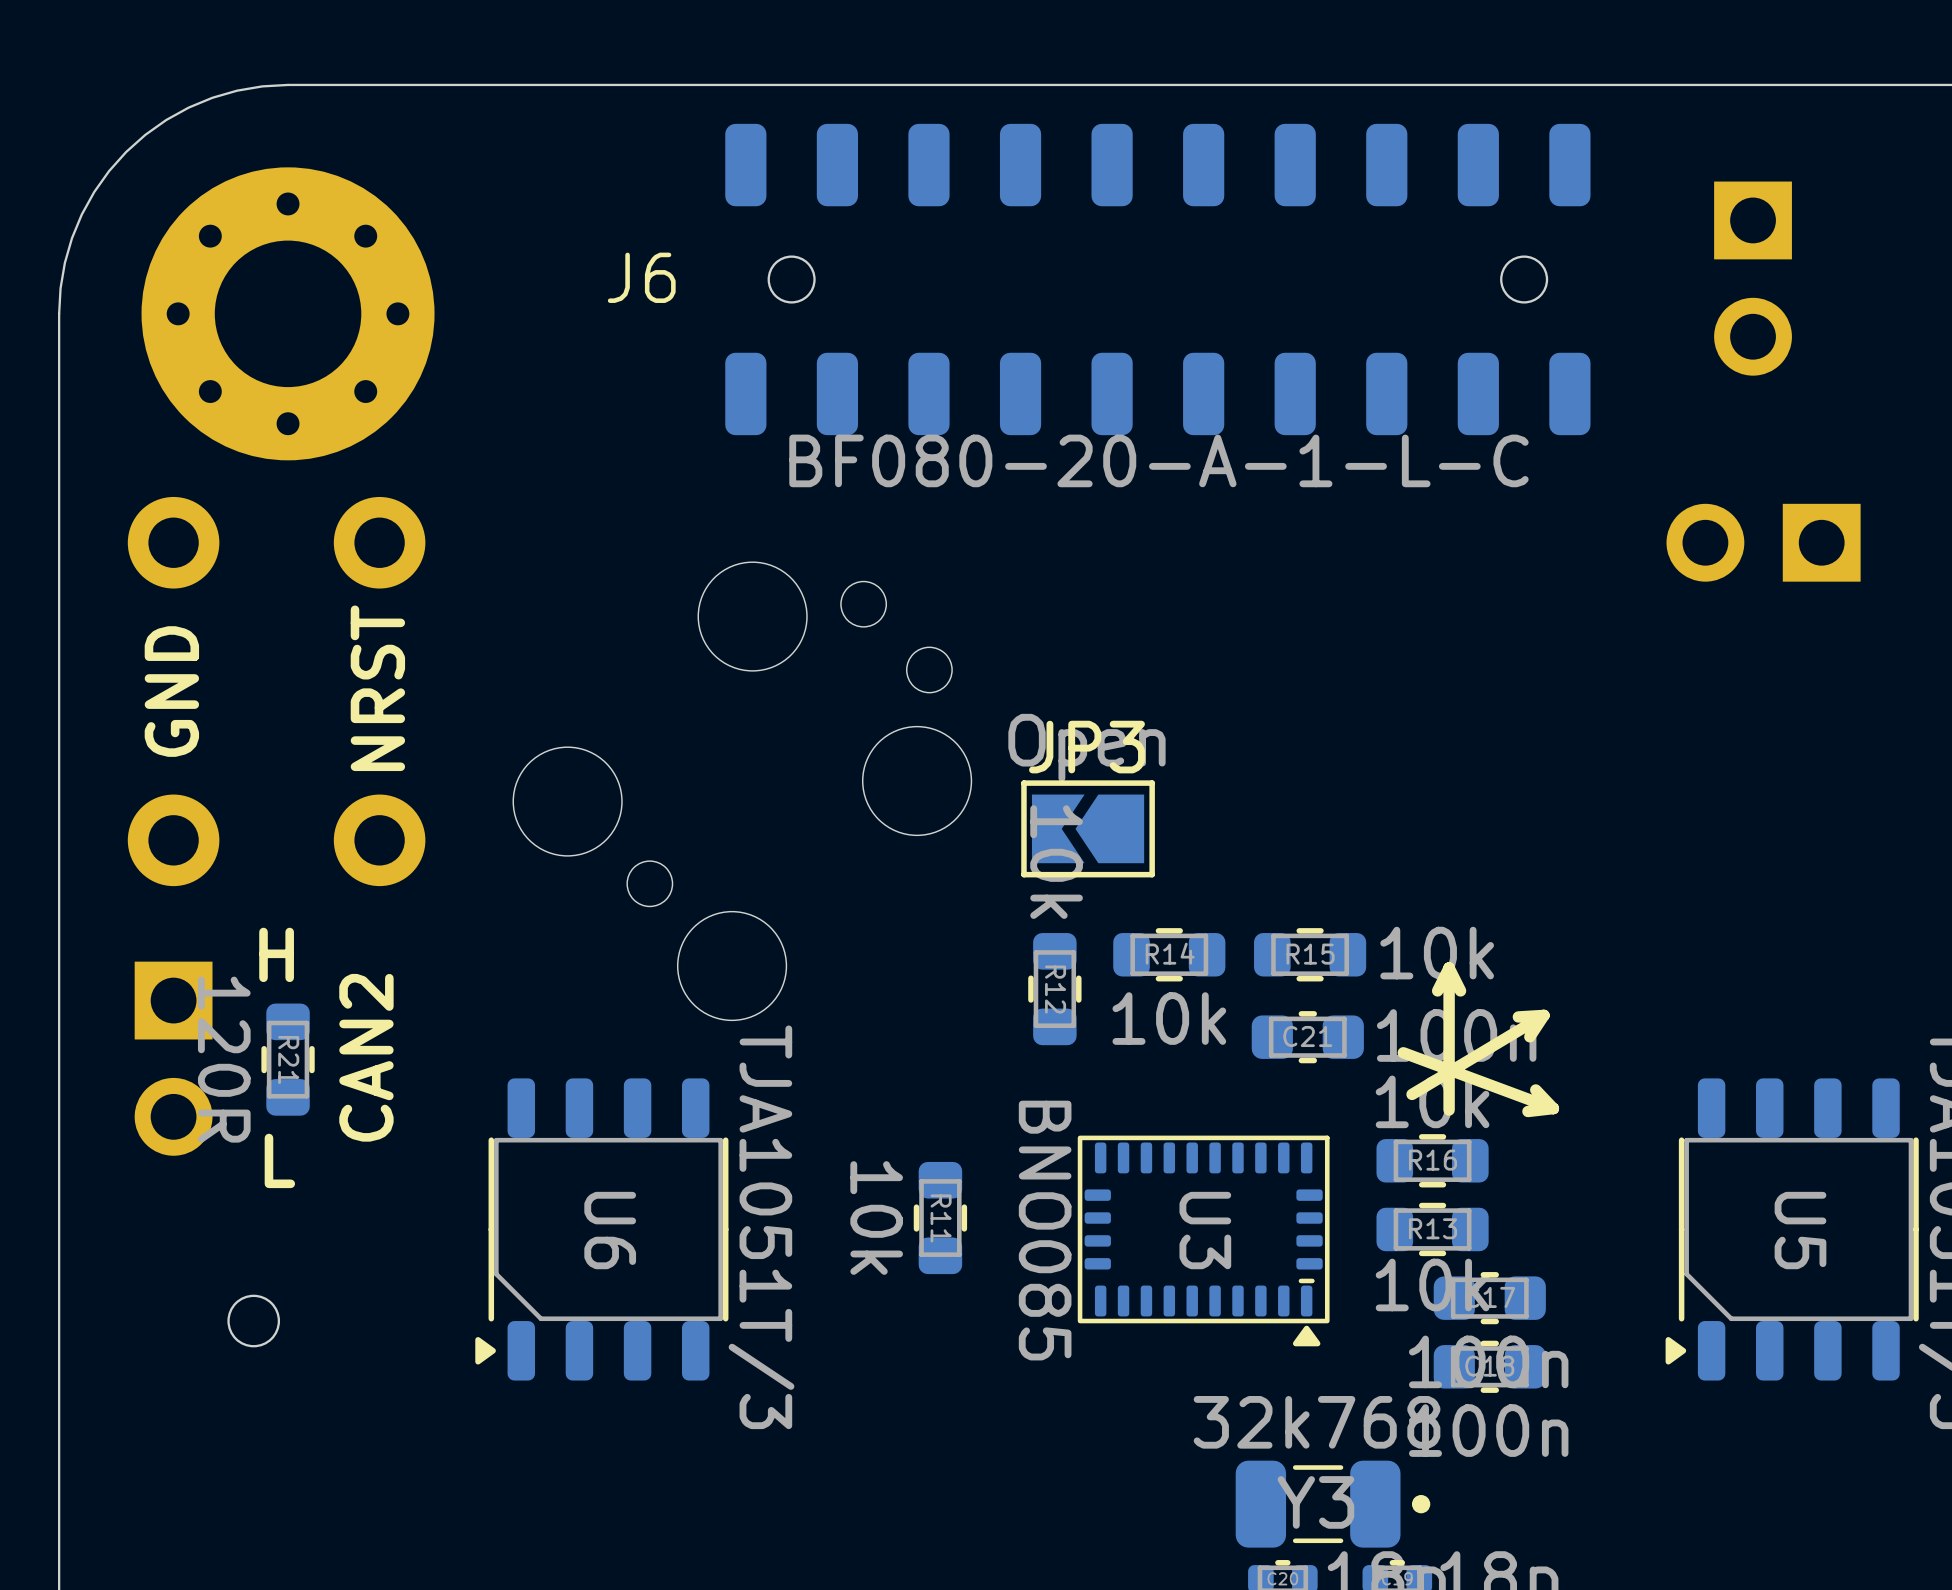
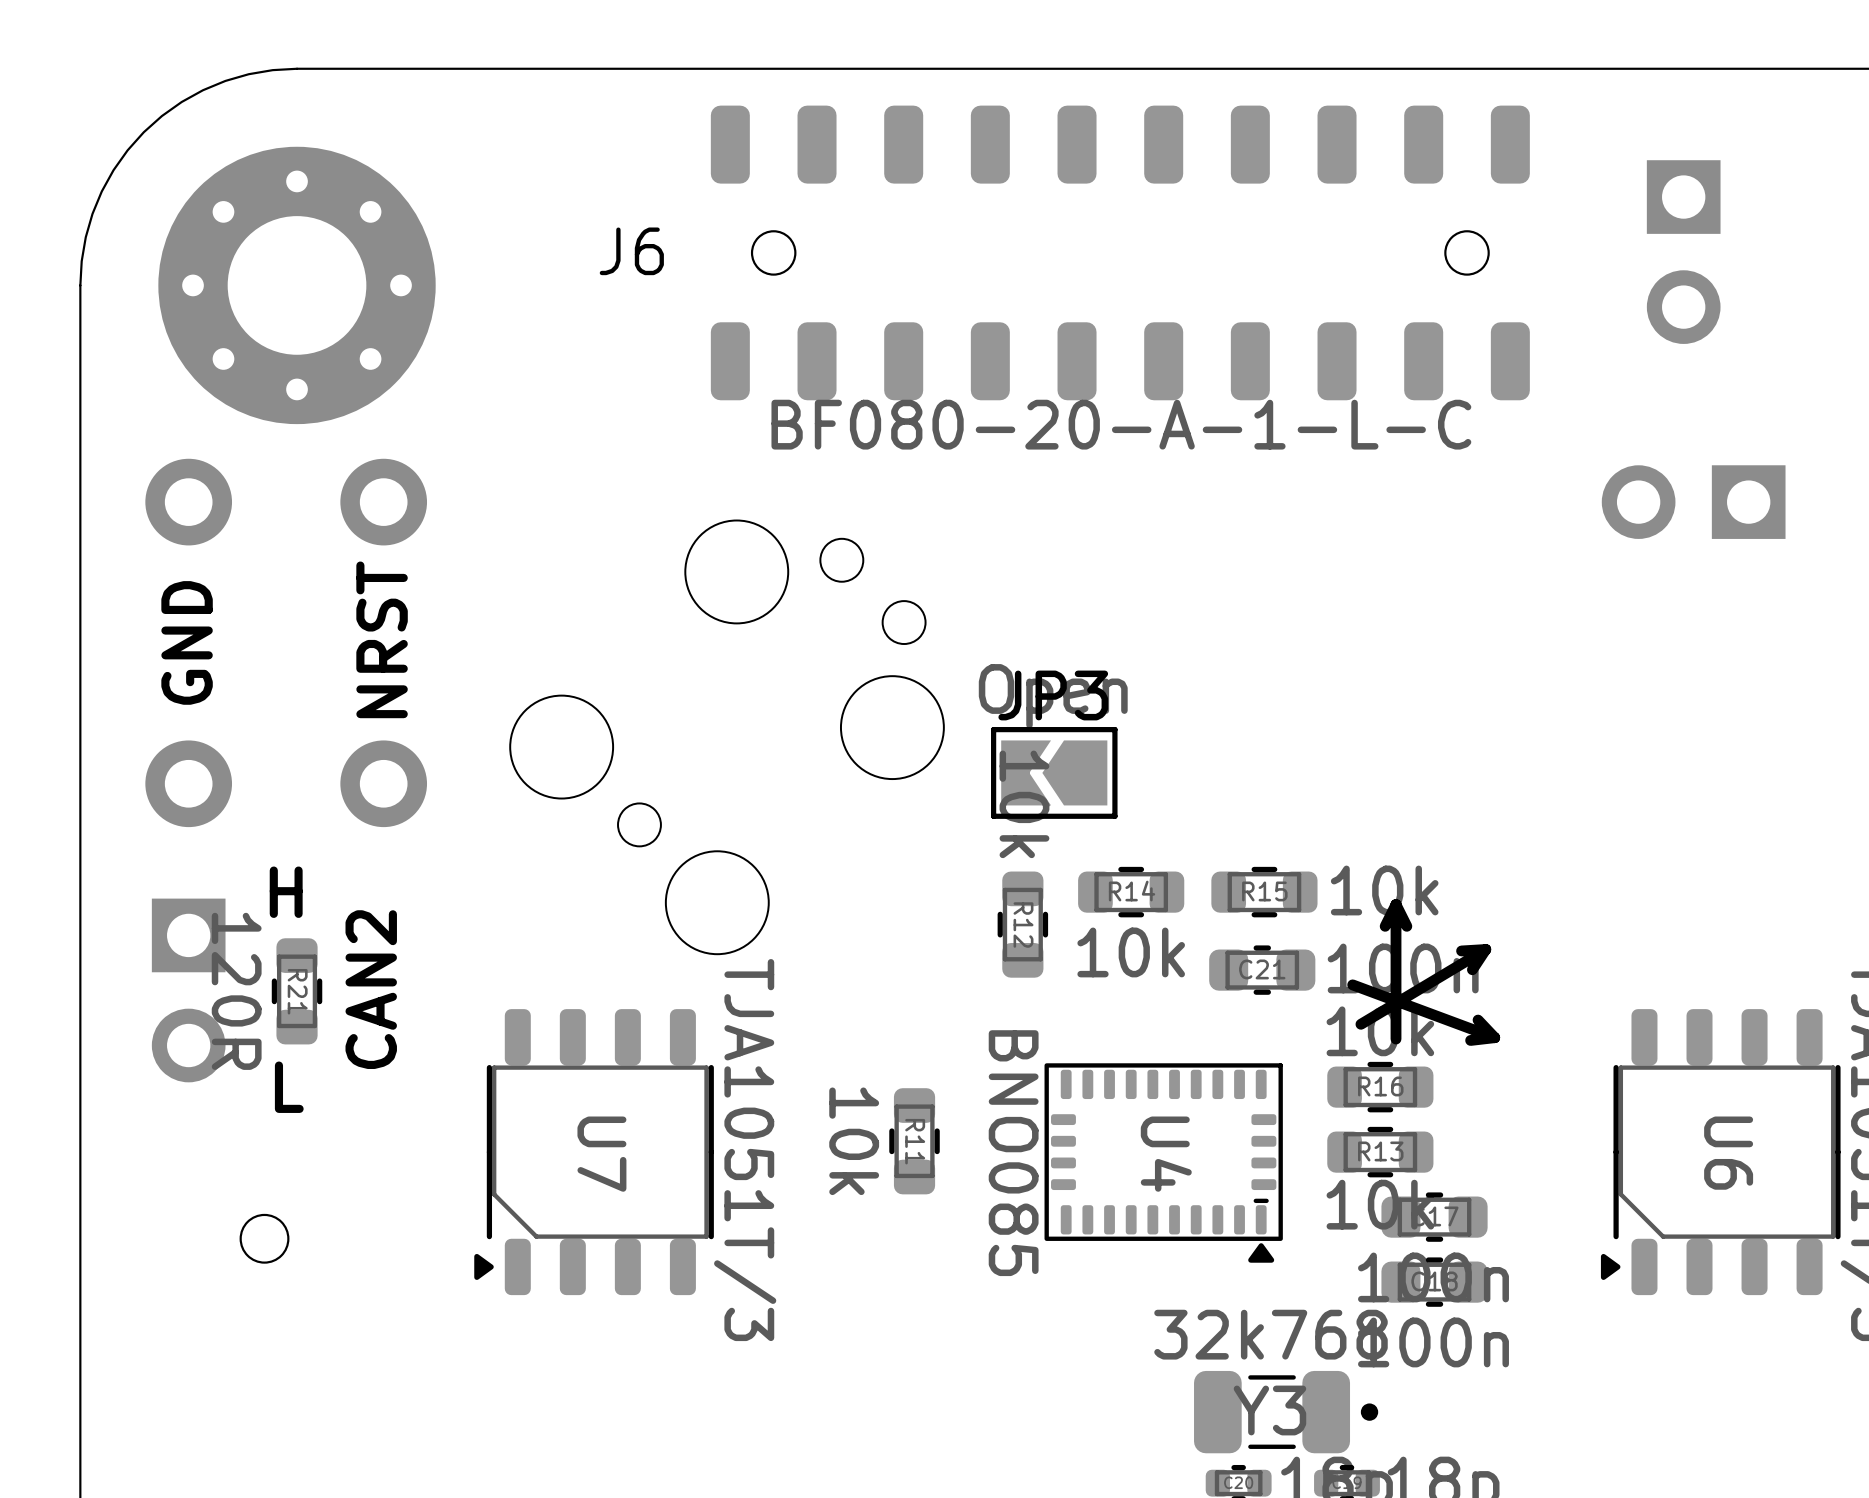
U6 name: U6 (610, 1230) -> U7 (601, 1154)
U3 name: U3 (1205, 1230) -> U4 (1166, 1154)
U5 name: U5 (1800, 1230) -> U6 (1728, 1153)

